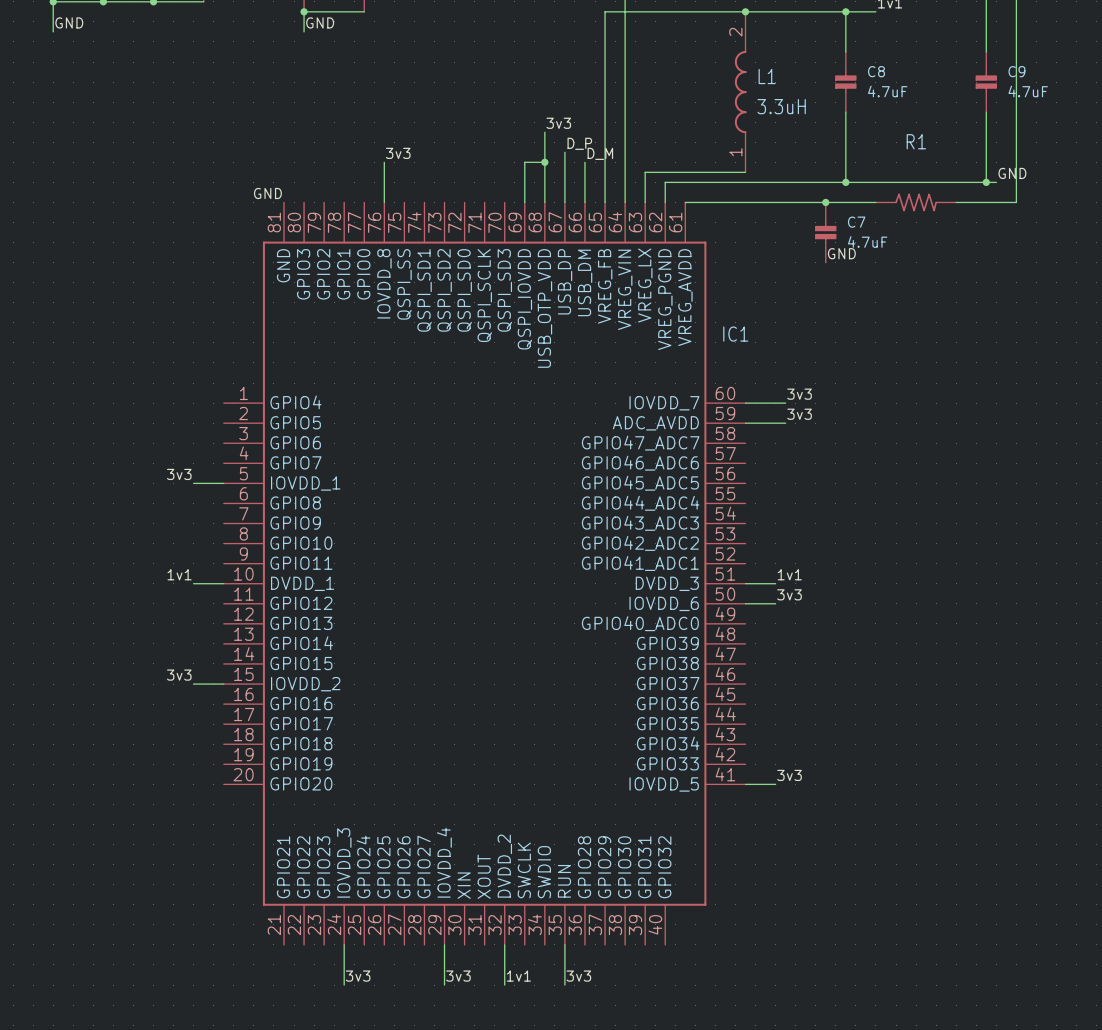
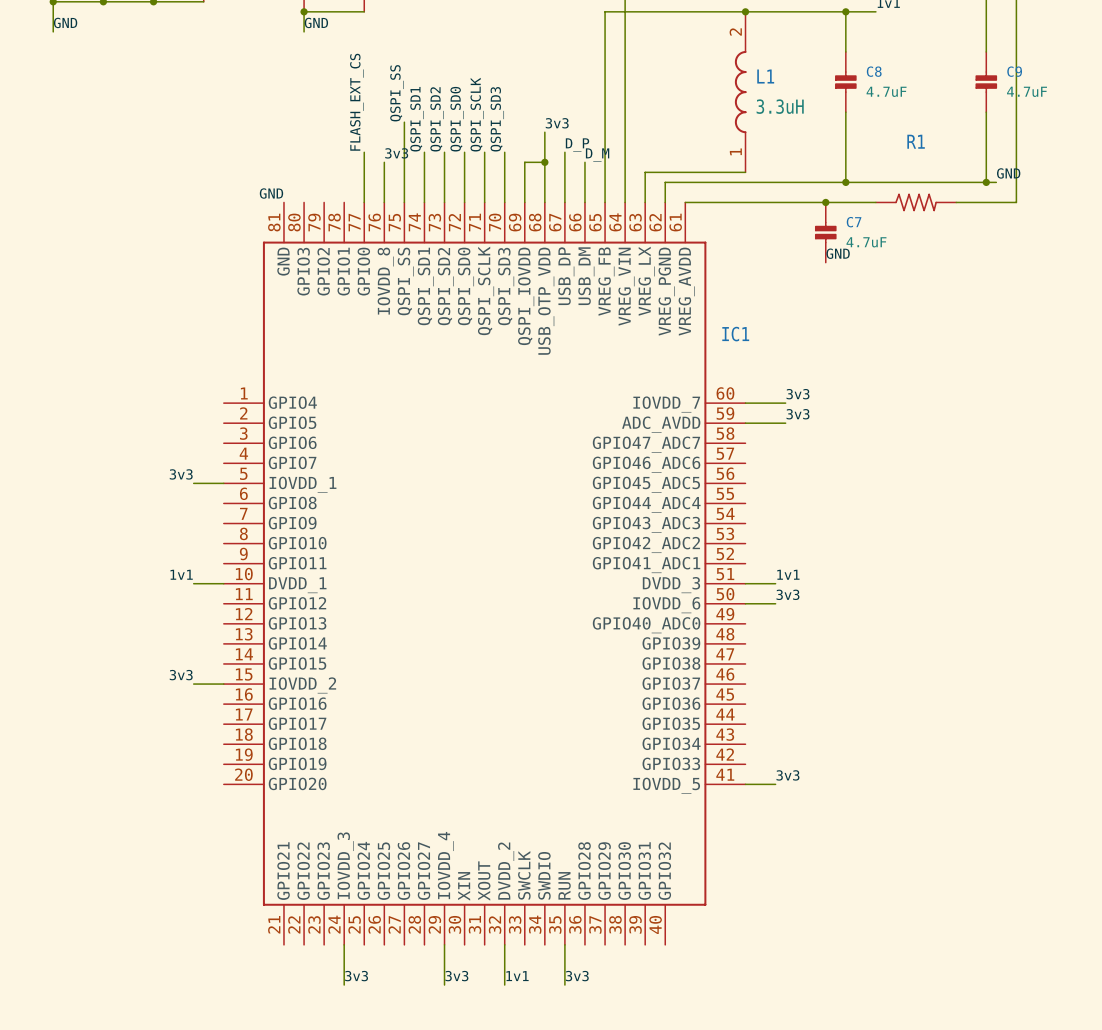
label: none -> QSPI_SS (396, 93)
label: none -> FLASH_EXT_CS (356, 102)
label: none -> QSPI_SCLK (477, 114)
label: none -> QSPI_SD1 (417, 119)
label: none -> QSPI_SD2 (437, 119)
label: none -> QSPI_SD0 (457, 119)
label: none -> QSPI_SD3 (497, 119)
wire: none -> (404, 122) (404, 202)
wire: none -> (364, 152) (364, 202)
wire: none -> (424, 152) (424, 202)
wire: none -> (444, 152) (444, 202)
wire: none -> (464, 152) (464, 202)
wire: none -> (484, 152) (484, 202)
wire: none -> (504, 152) (504, 202)

